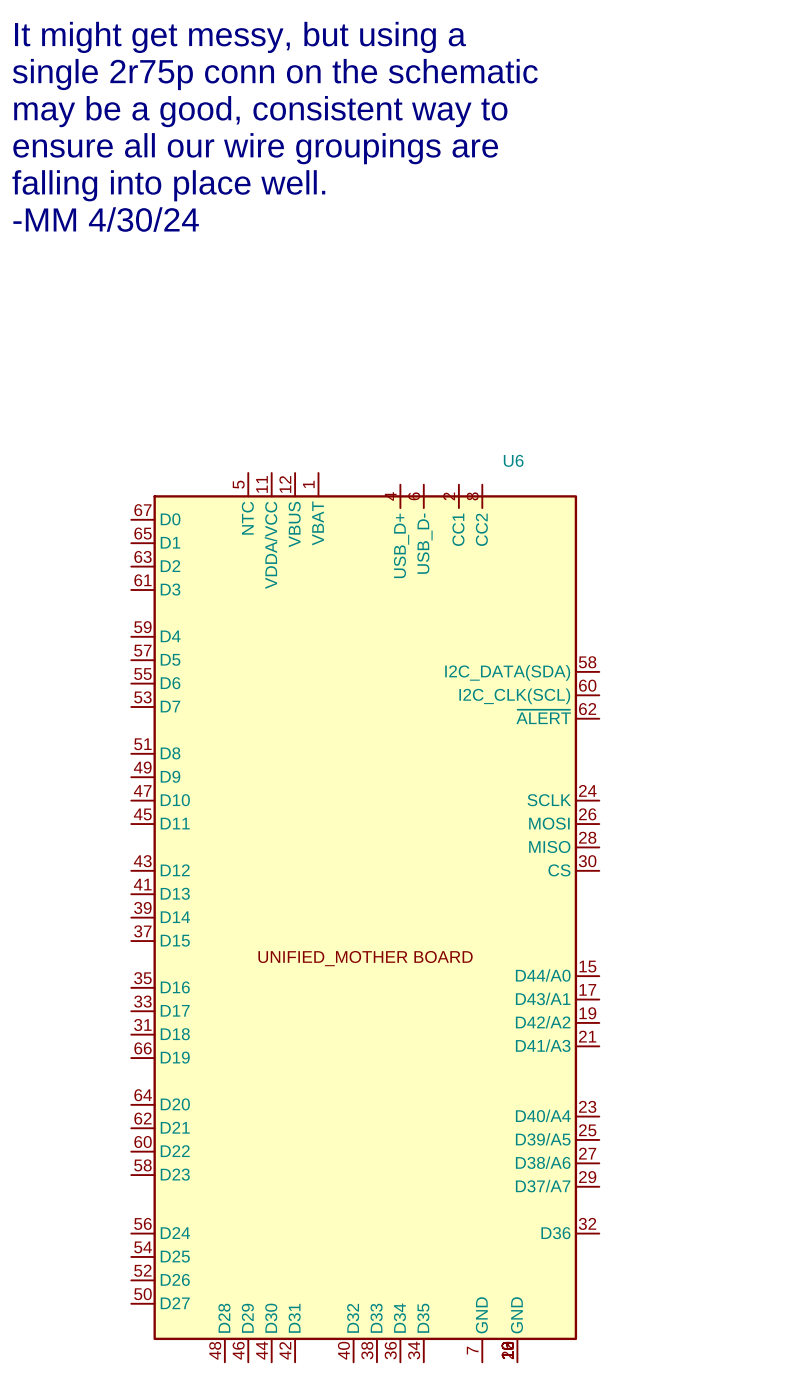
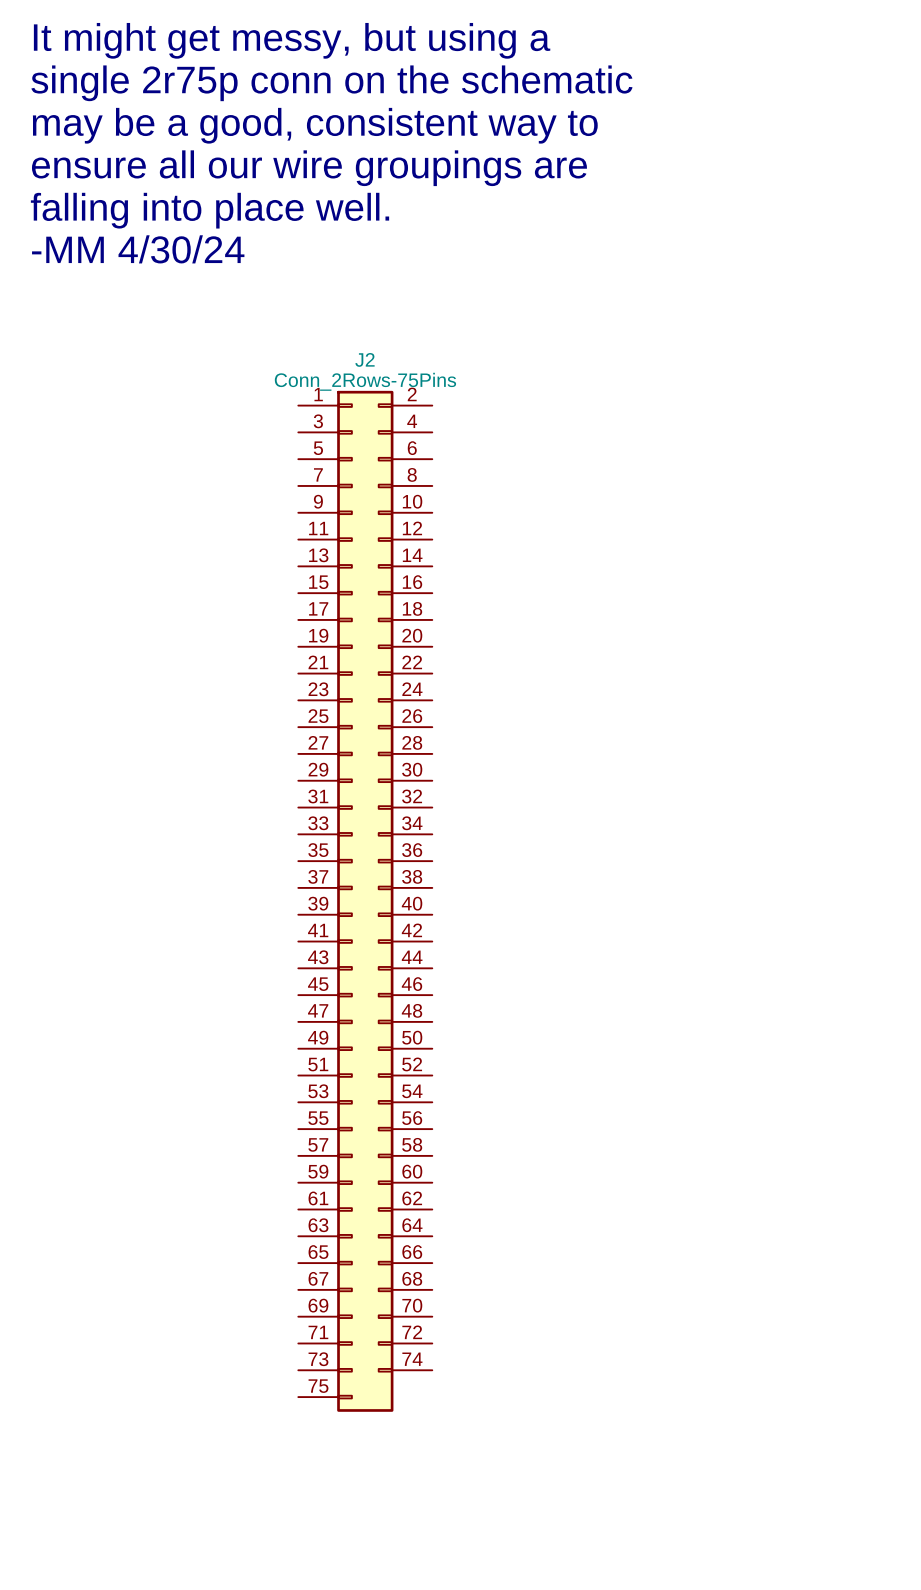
J2: none -> Conn_2Rows-75Pins (365, 901)
U6: (365, 917) -> none

